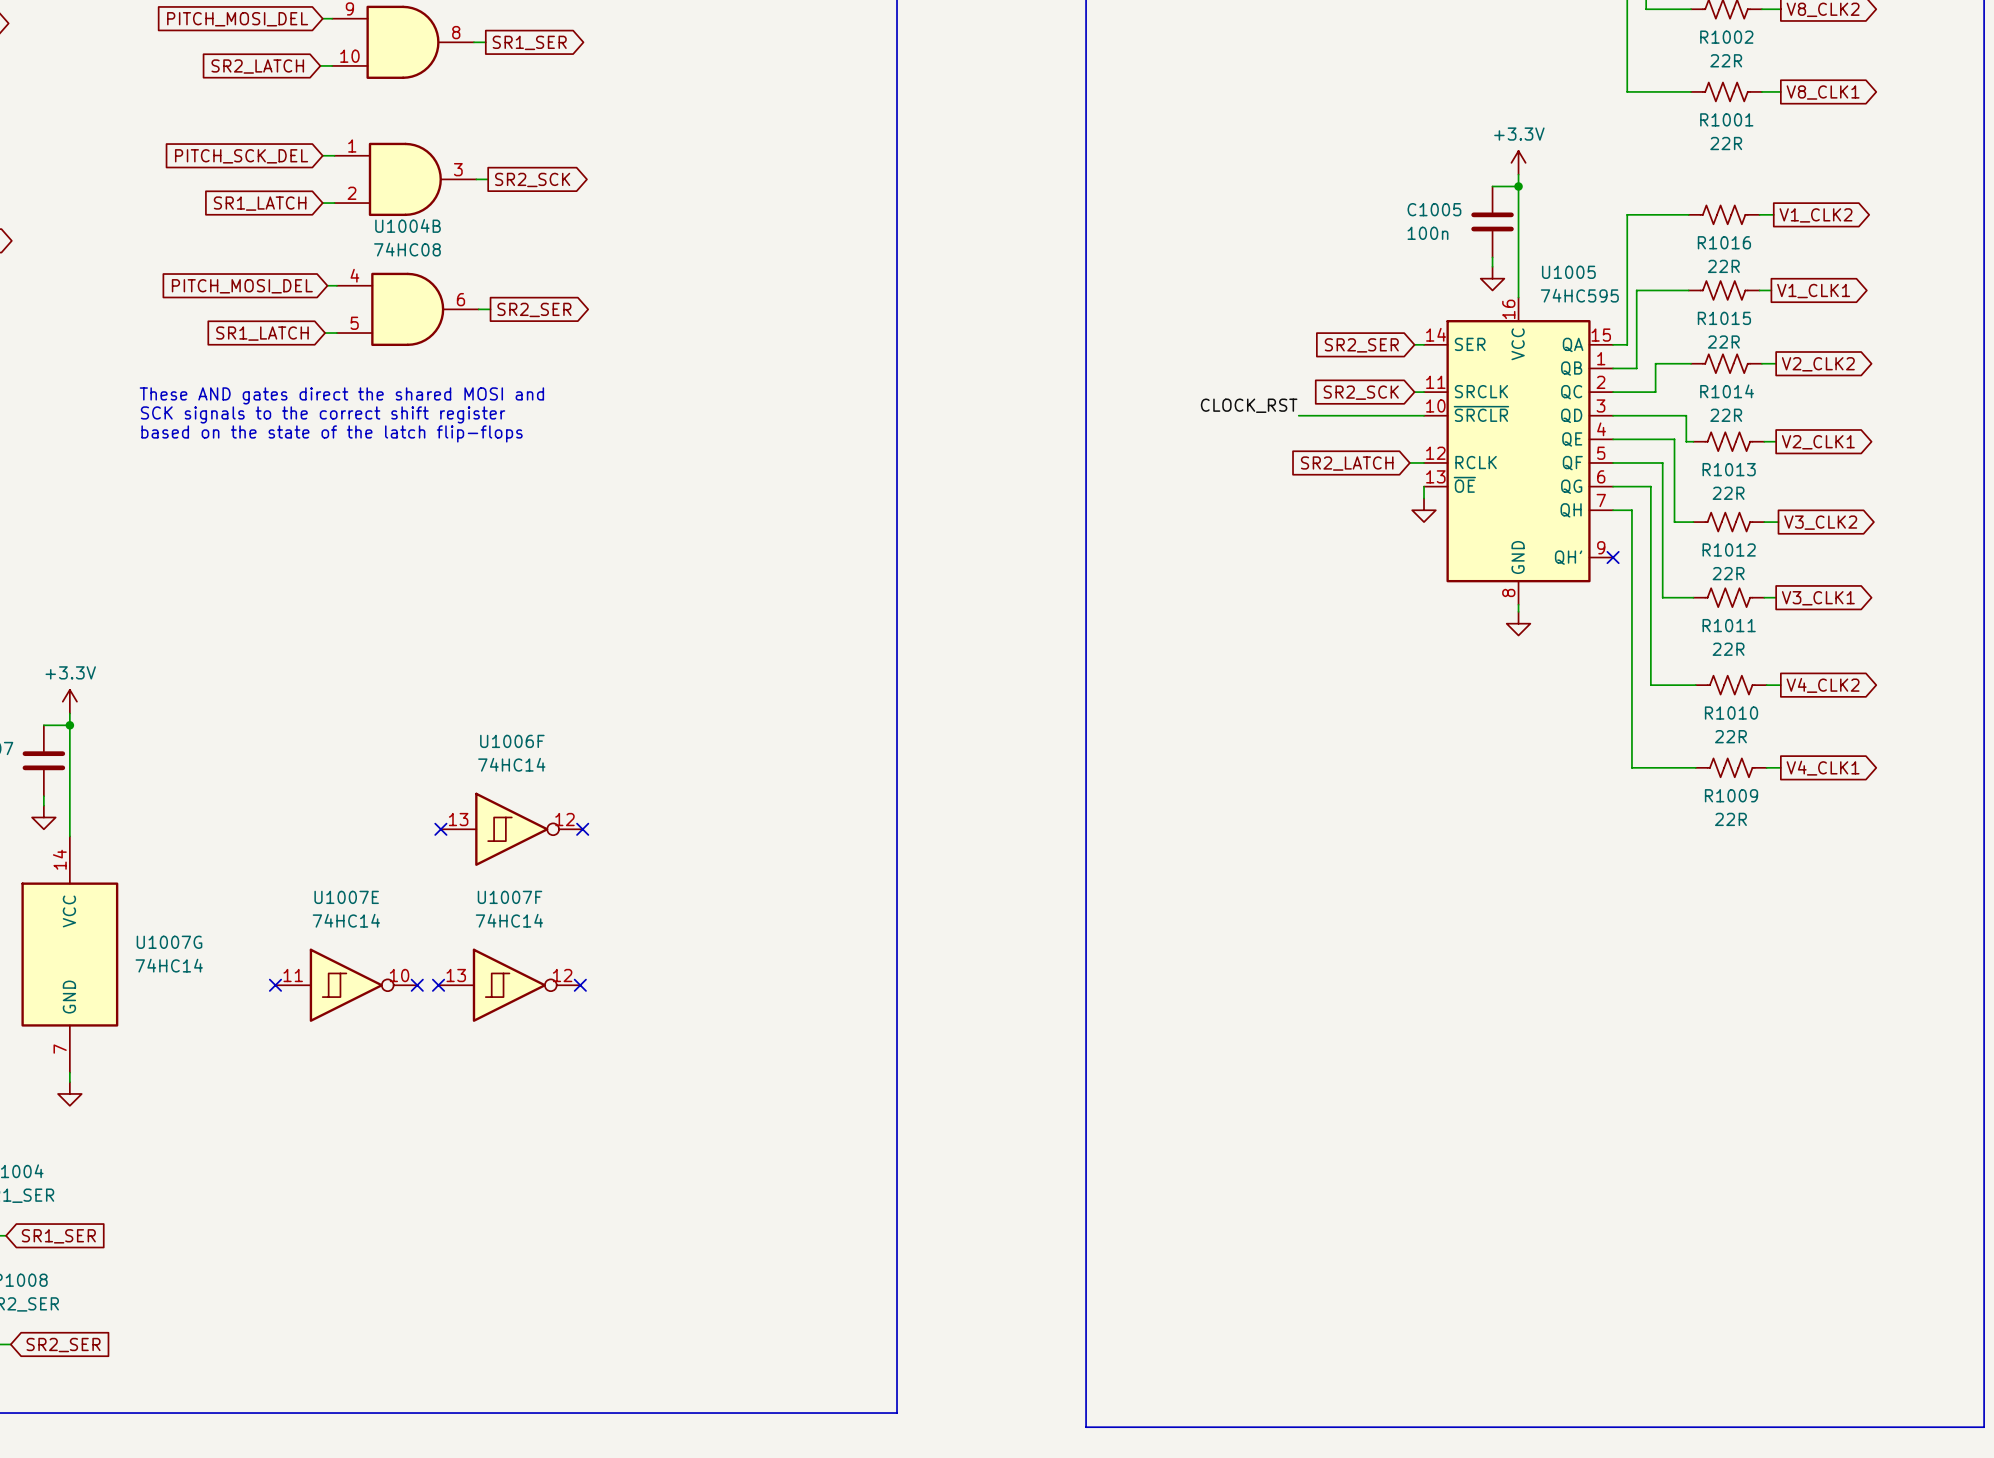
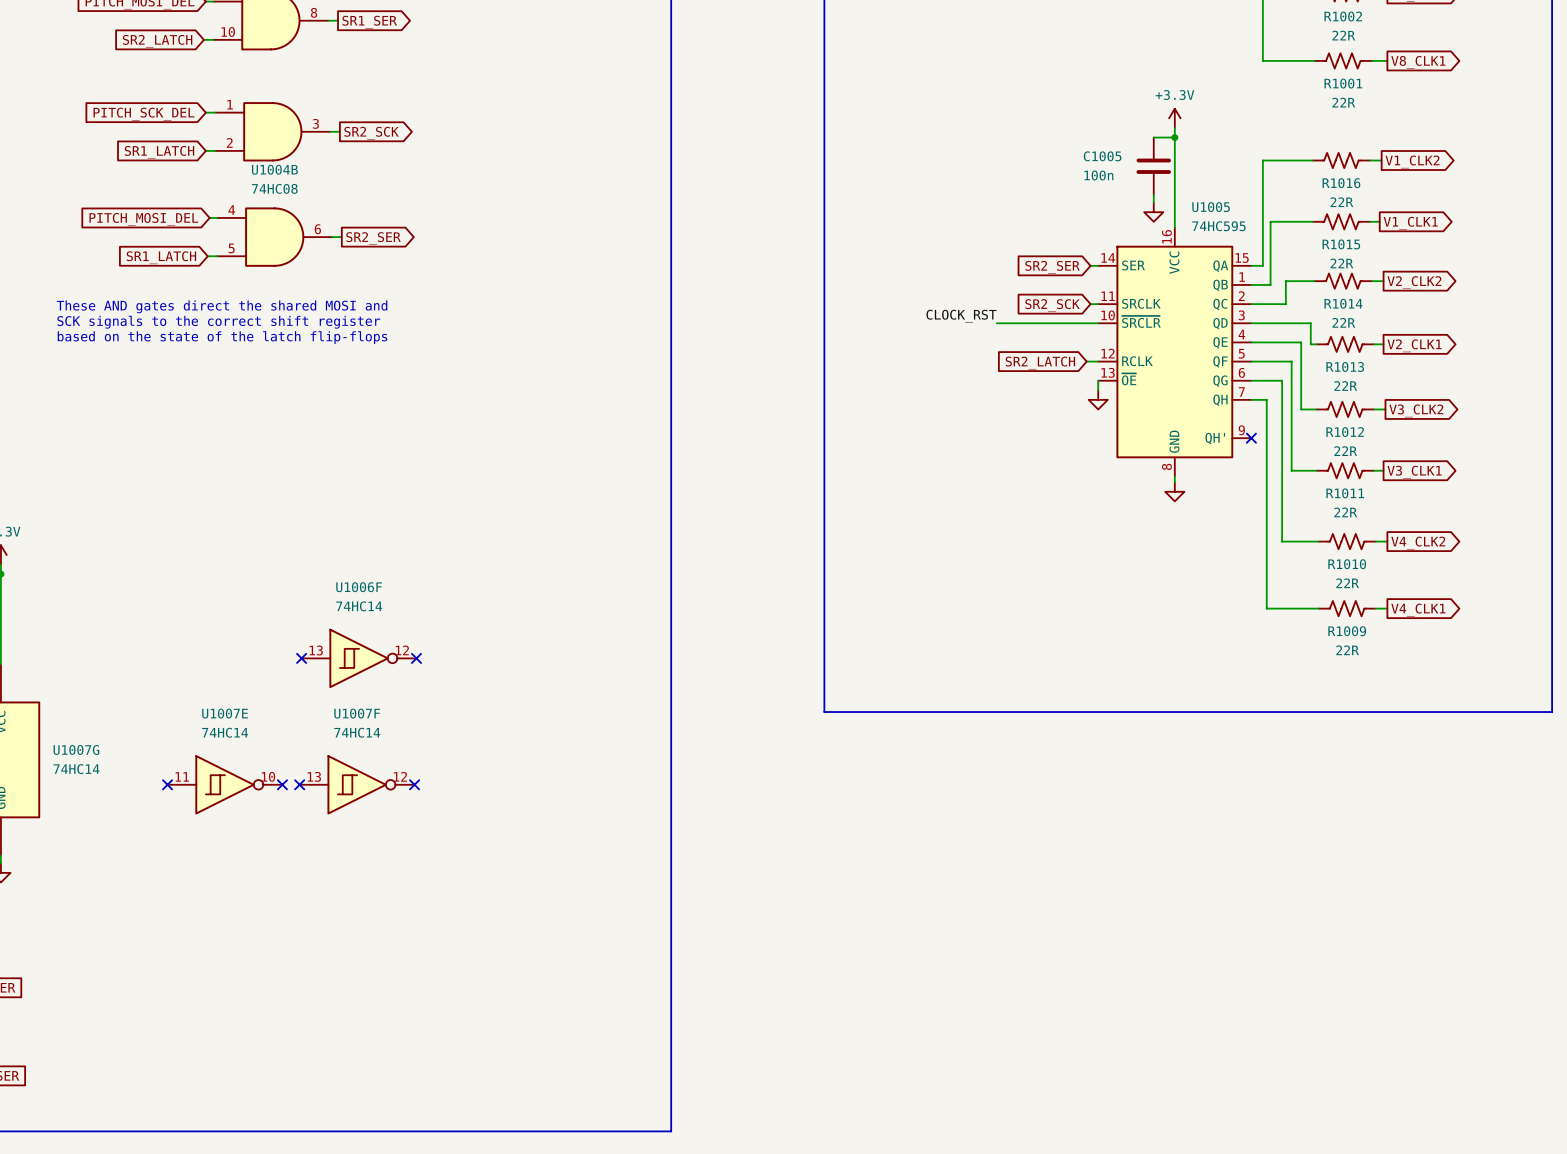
line: (1086, 895) (1086, 1427) (1984, 1427) (1984, 895) -> (824, 712) (1552, 712)

